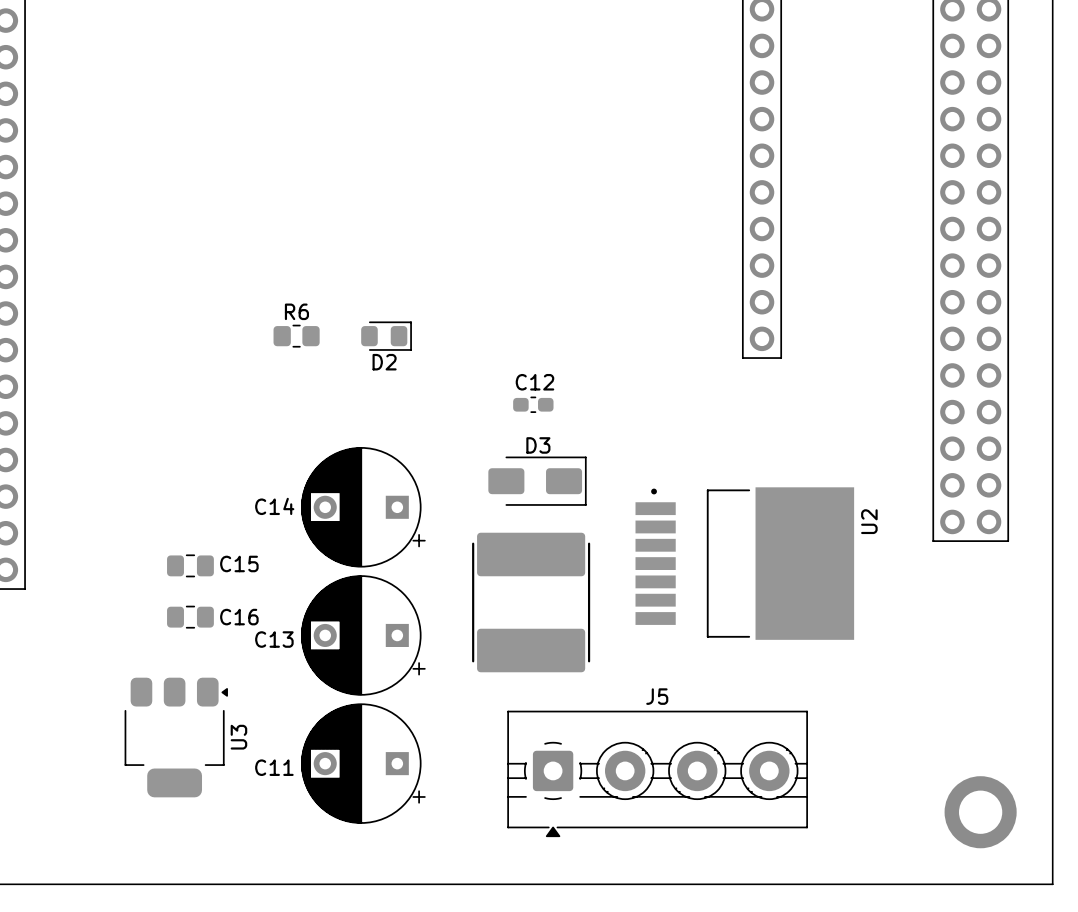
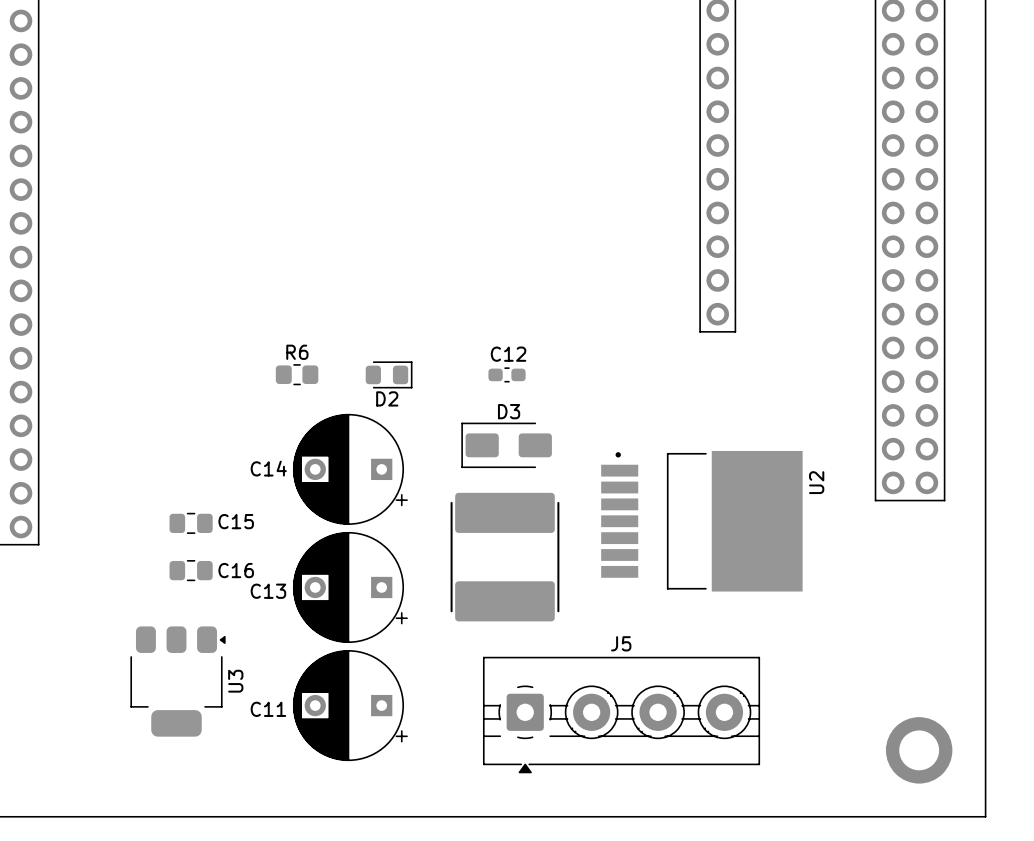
R6 position: (296, 336) -> (297, 374)
D2 position: (386, 336) -> (389, 374)
D3 rotation: 0° (537, 481) -> 180° (506, 445)

